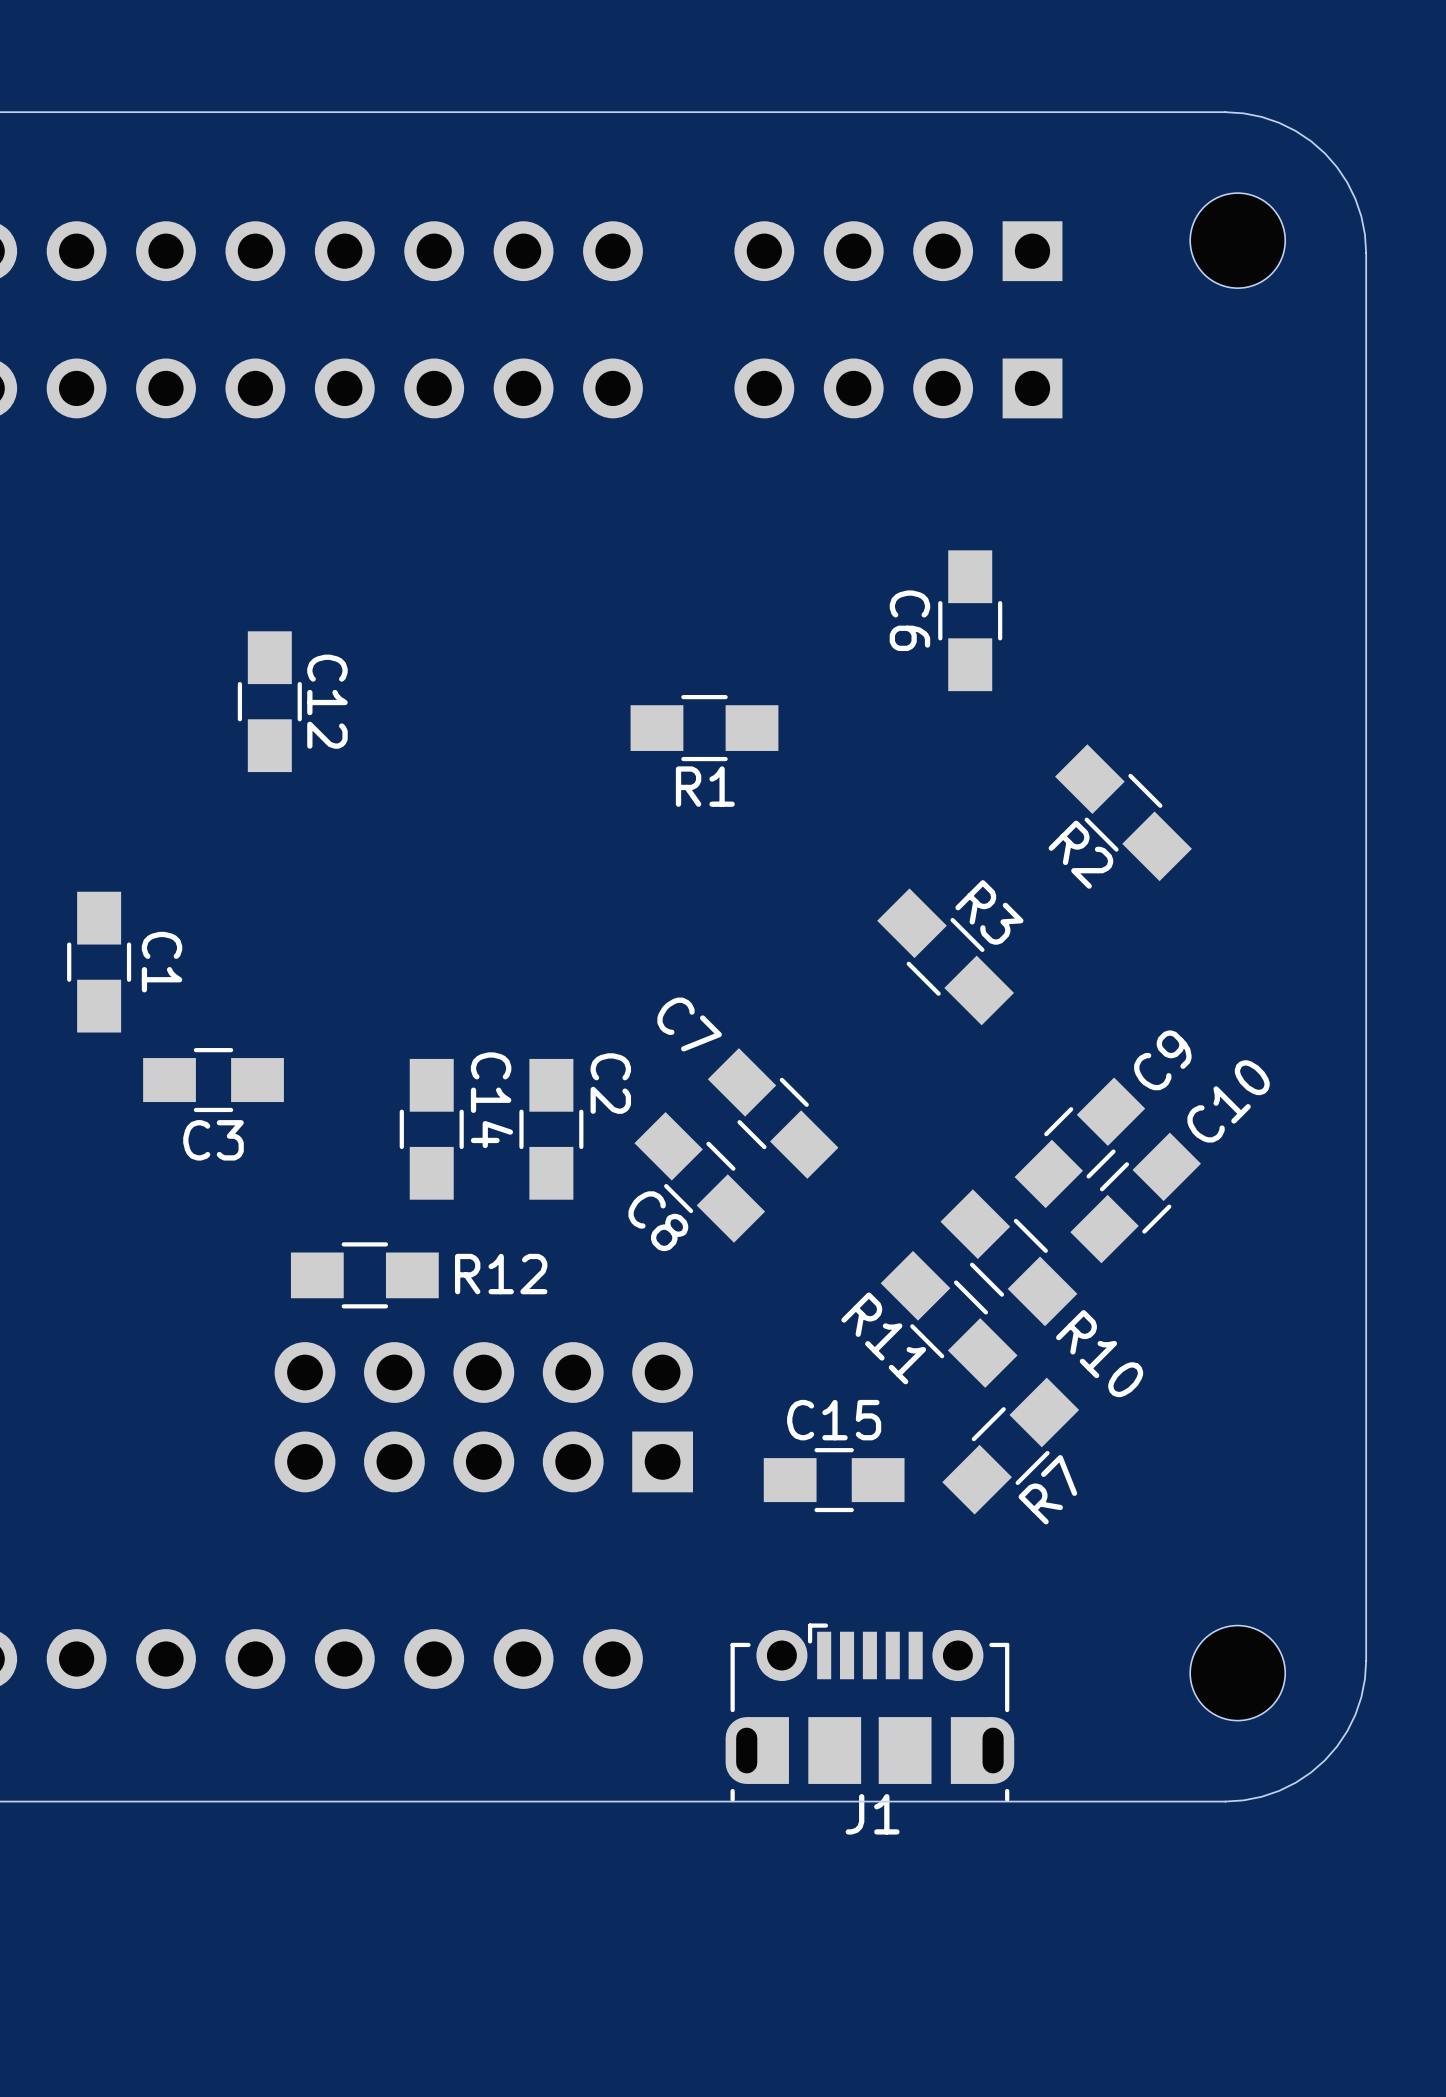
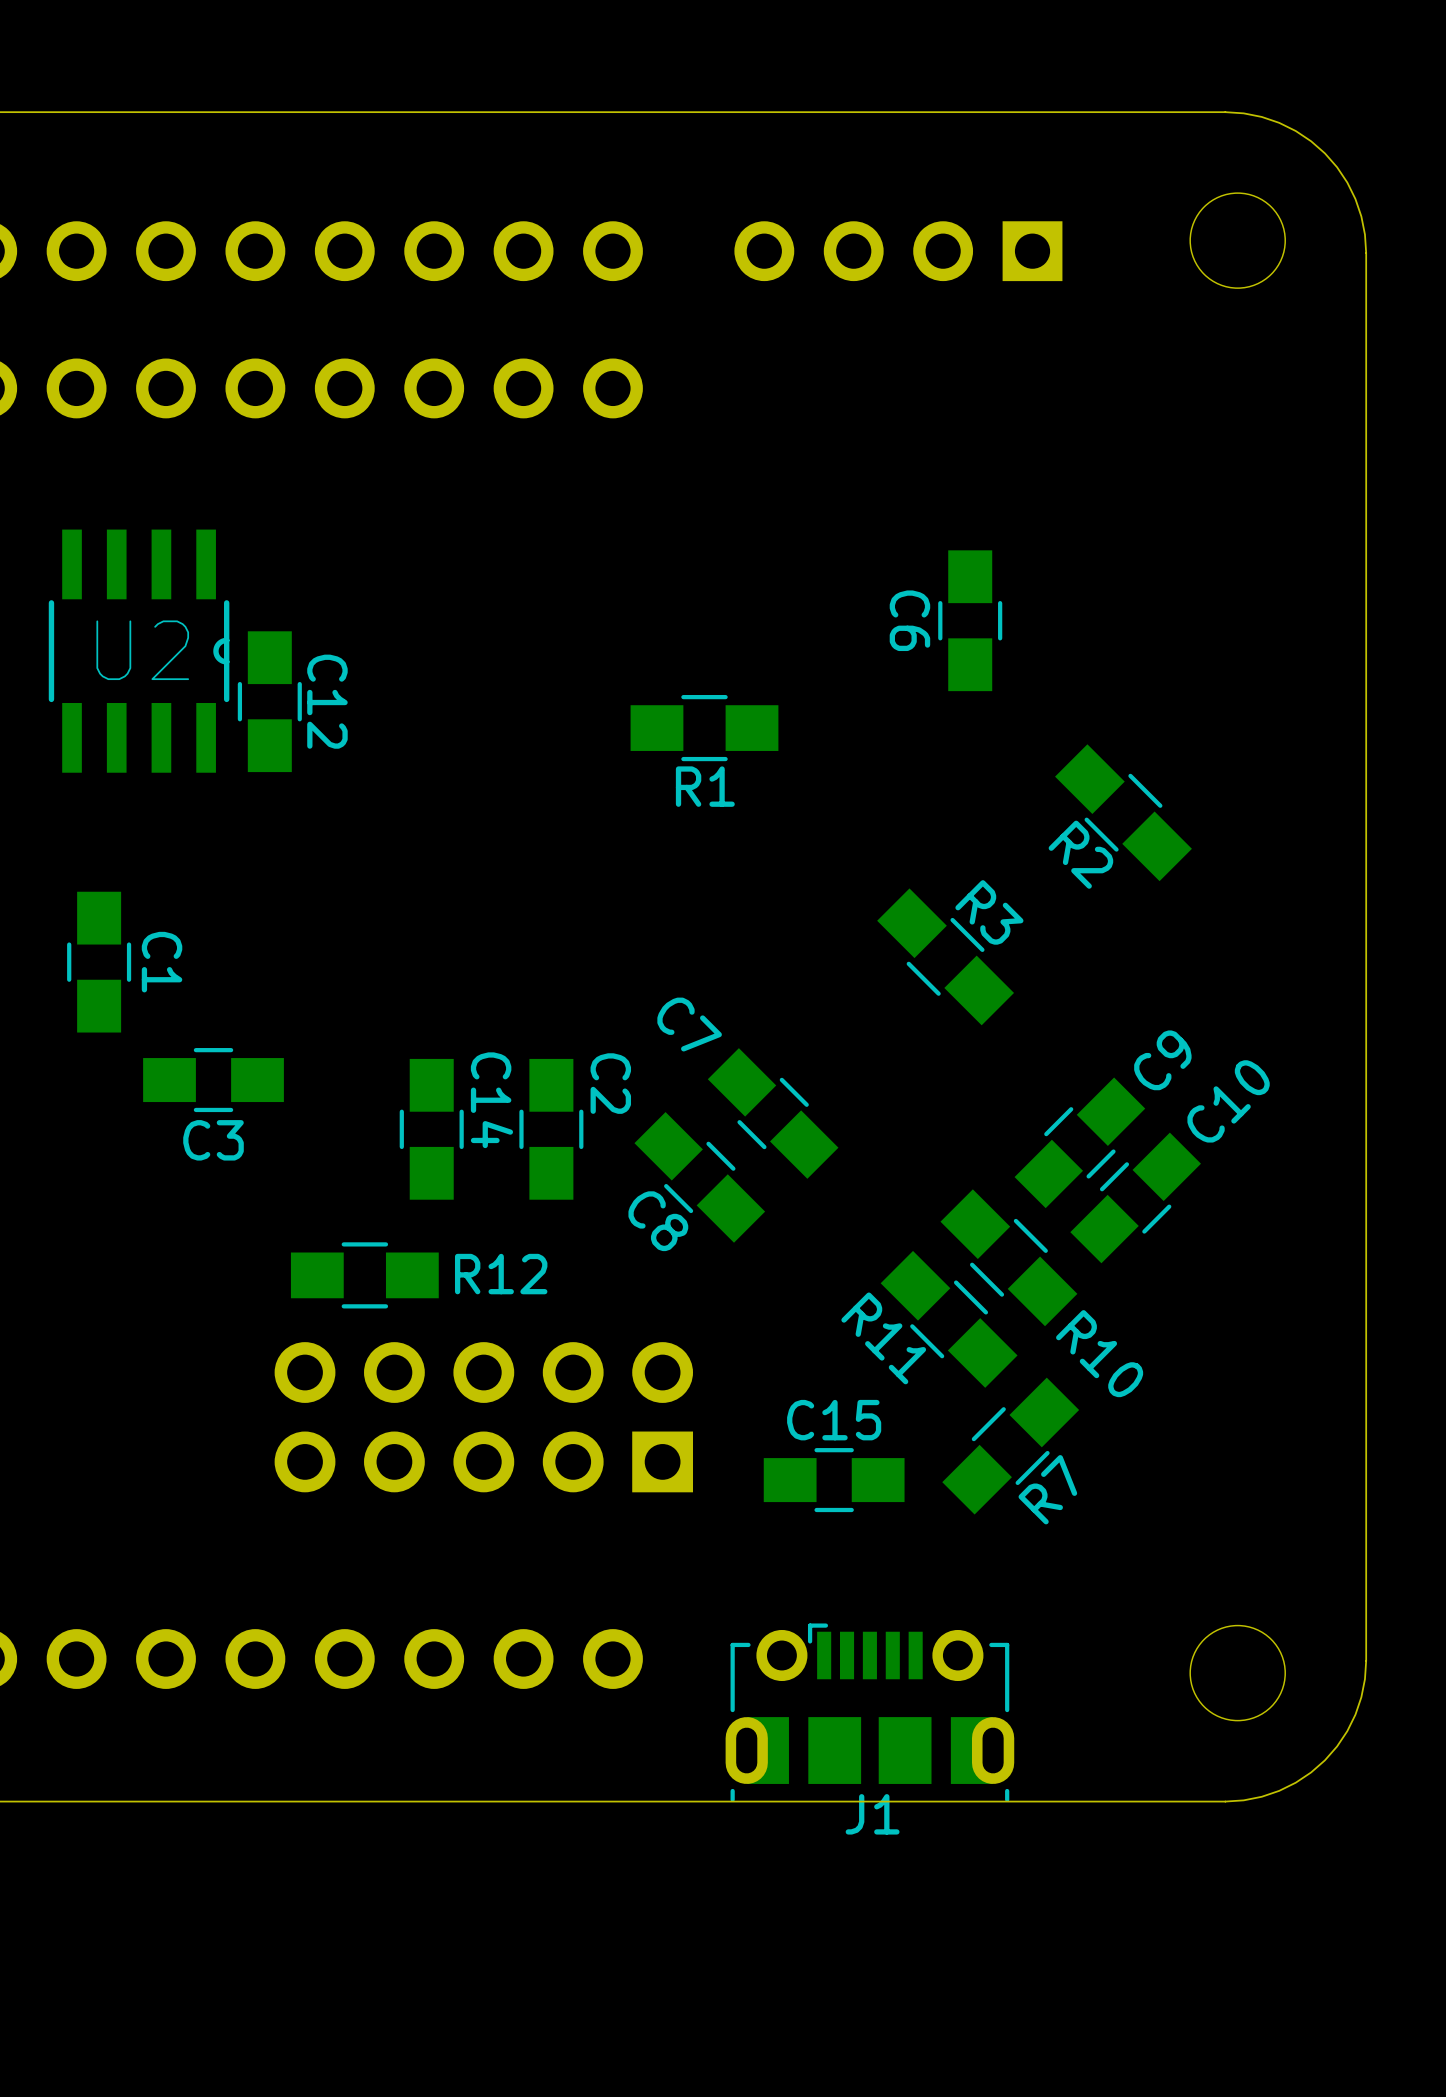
part: (898, 388) -> none
U2: none -> (139, 651)

